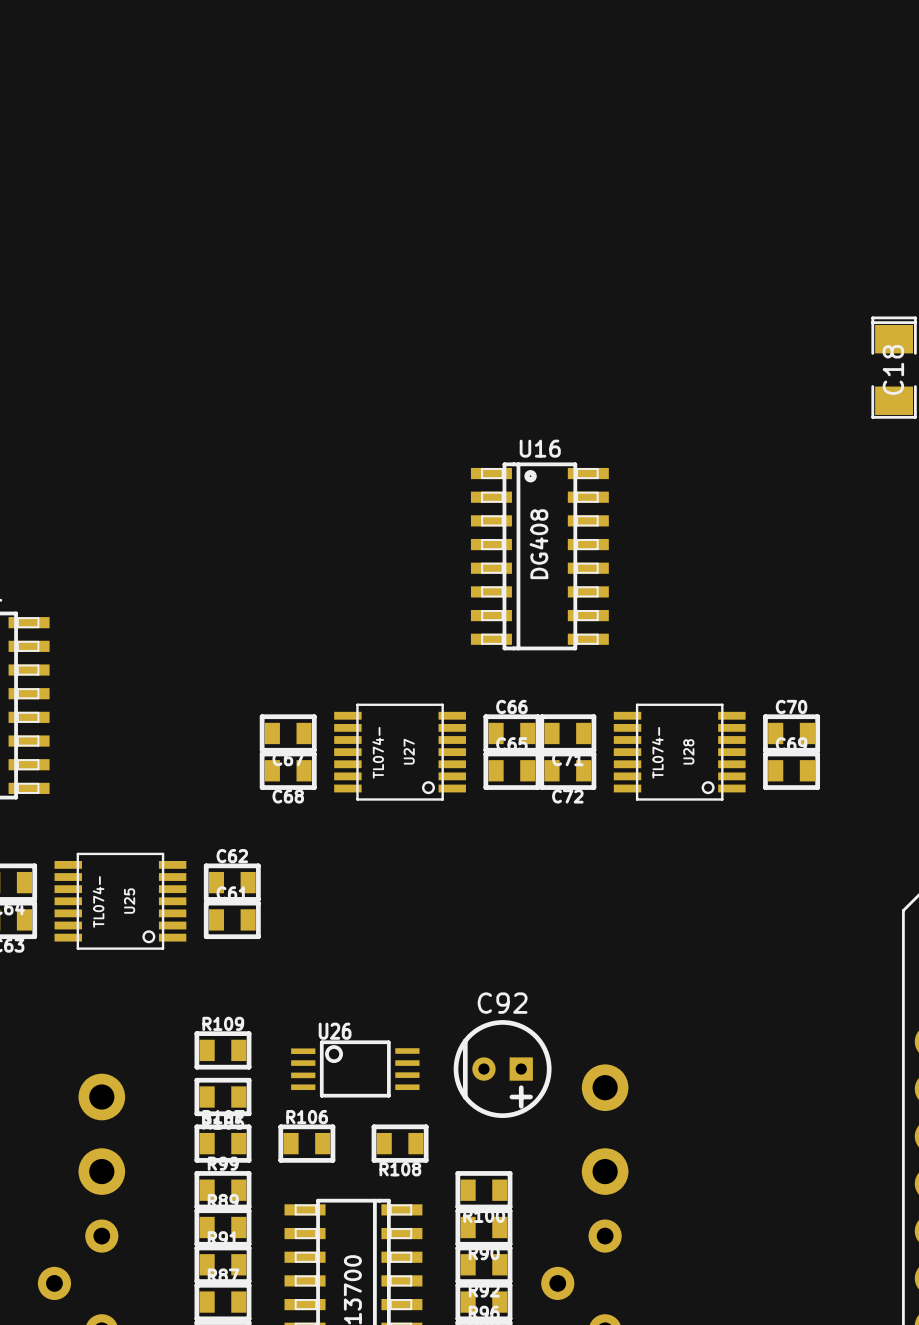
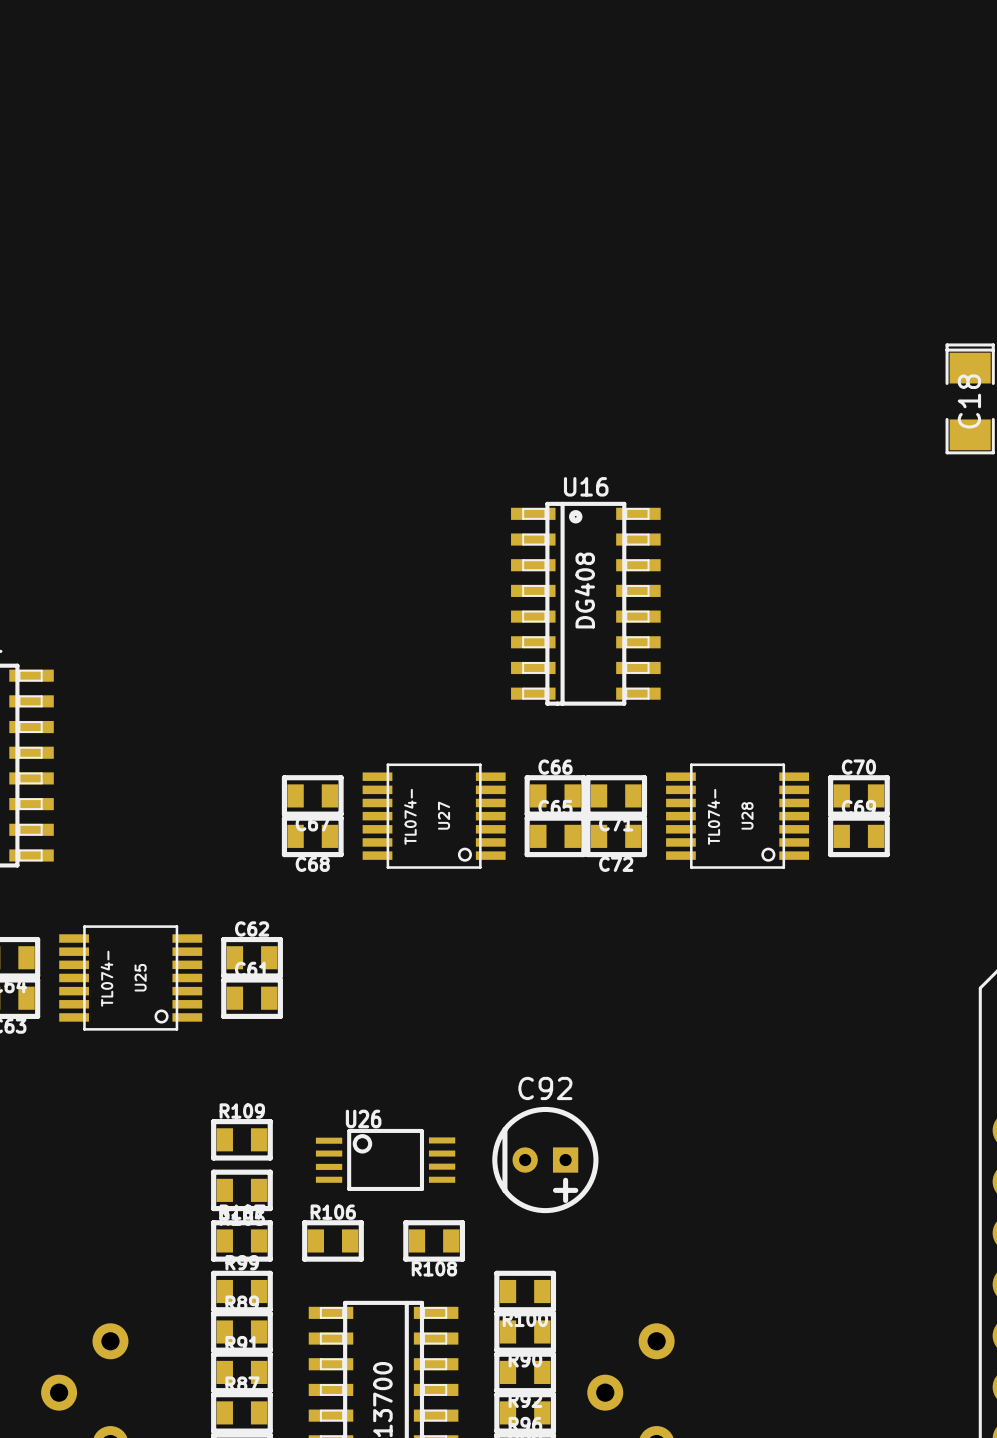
part: (605, 1087) -> none
part: (101, 1097) -> none
part: (101, 1171) -> none
part: (605, 1171) -> none

